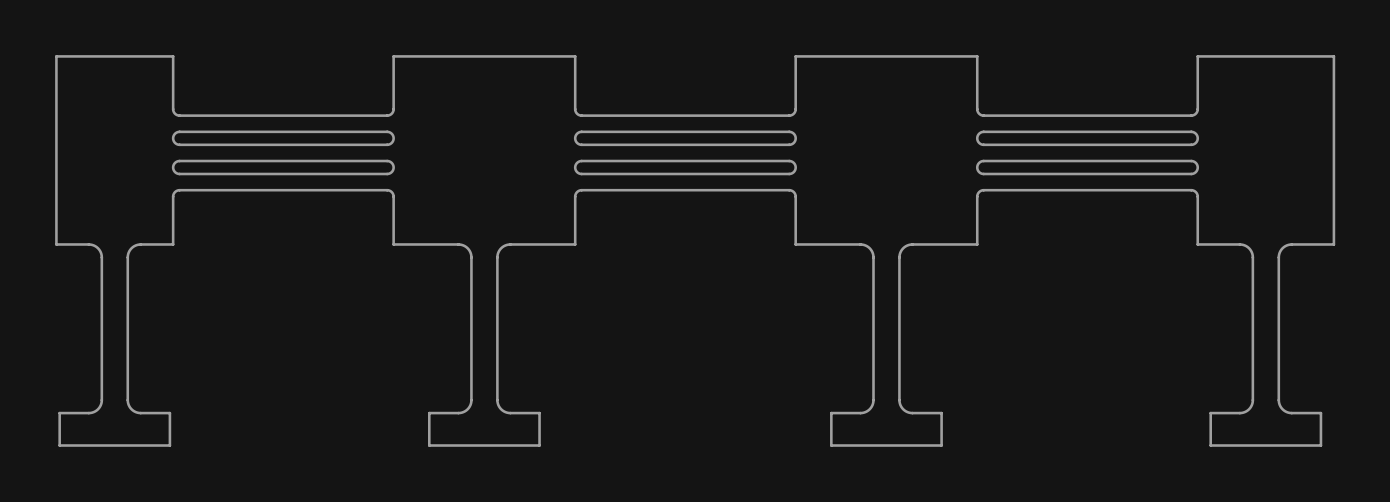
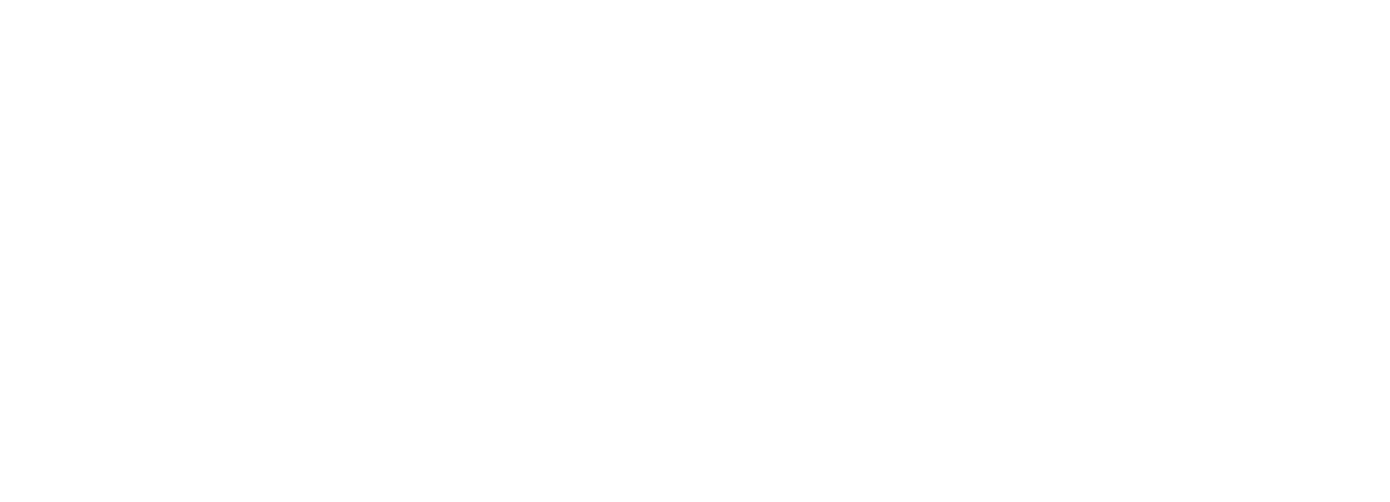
board edge: (1333, 56) (1333, 244) (1288, 244) (1281, 249) (1278, 257) (1279, 403) (1282, 409) (1288, 412) (1320, 413) (1320, 445) (1210, 445) (1210, 413) (1243, 412) (1249, 409) (1252, 403) (1252, 255) (1250, 249) (1243, 244) (1197, 244) (1197, 195) (1195, 192) (1191, 190) (982, 190) (977, 195) (977, 244) (912, 244) (903, 248) (899, 257) (899, 401) (902, 408) (909, 412) (941, 413) (941, 445) (831, 445) (831, 413) (863, 412) (869, 409) (873, 403) (873, 255) (869, 248) (862, 244) (795, 244) (795, 195) (790, 190) (580, 190) (575, 195) (575, 244) (510, 244) (501, 248) (497, 257) (497, 401) (500, 408) (507, 412) (539, 413) (539, 445) (429, 445) (429, 413) (461, 412) (467, 409) (471, 403) (471, 255) (467, 248) (460, 244) (393, 244) (393, 196) (391, 191) (177, 190) (173, 195) (173, 244) (137, 244) (130, 249) (127, 257) (128, 403) (131, 409) (137, 412) (169, 413) (169, 445) (59, 445) (59, 413) (92, 412) (98, 409) (101, 403) (101, 257) (99, 249) (92, 244) (56, 244) (56, 56) (173, 56) (173, 109) (175, 113) (179, 115) (388, 115) (393, 109) (393, 56) (575, 56) (575, 109) (580, 115) (790, 115) (795, 109) (795, 56) (977, 56) (977, 109) (982, 115) (1191, 115) (1195, 114) (1197, 109) (1197, 56) (1333, 56) -> none
board edge: (387, 131) (179, 131) (175, 133) (173, 138) (175, 142) (179, 144) (387, 144) (391, 142) (393, 138) (391, 133) (387, 131) -> none
board edge: (789, 131) (581, 131) (577, 133) (575, 138) (577, 142) (581, 144) (789, 144) (793, 142) (795, 138) (793, 133) (789, 131) -> none
board edge: (1191, 131) (983, 131) (979, 133) (977, 138) (979, 142) (983, 144) (1191, 144) (1195, 142) (1197, 138) (1195, 133) (1191, 131) -> none
board edge: (387, 161) (179, 161) (175, 162) (173, 167) (175, 172) (179, 173) (387, 173) (391, 172) (393, 167) (391, 162) (387, 161) -> none
board edge: (789, 161) (581, 161) (577, 162) (575, 167) (577, 172) (581, 173) (789, 173) (793, 172) (795, 167) (793, 162) (789, 161) -> none
board edge: (1191, 161) (983, 161) (979, 162) (977, 167) (979, 172) (983, 173) (1191, 173) (1195, 172) (1197, 167) (1195, 162) (1191, 161) -> none

